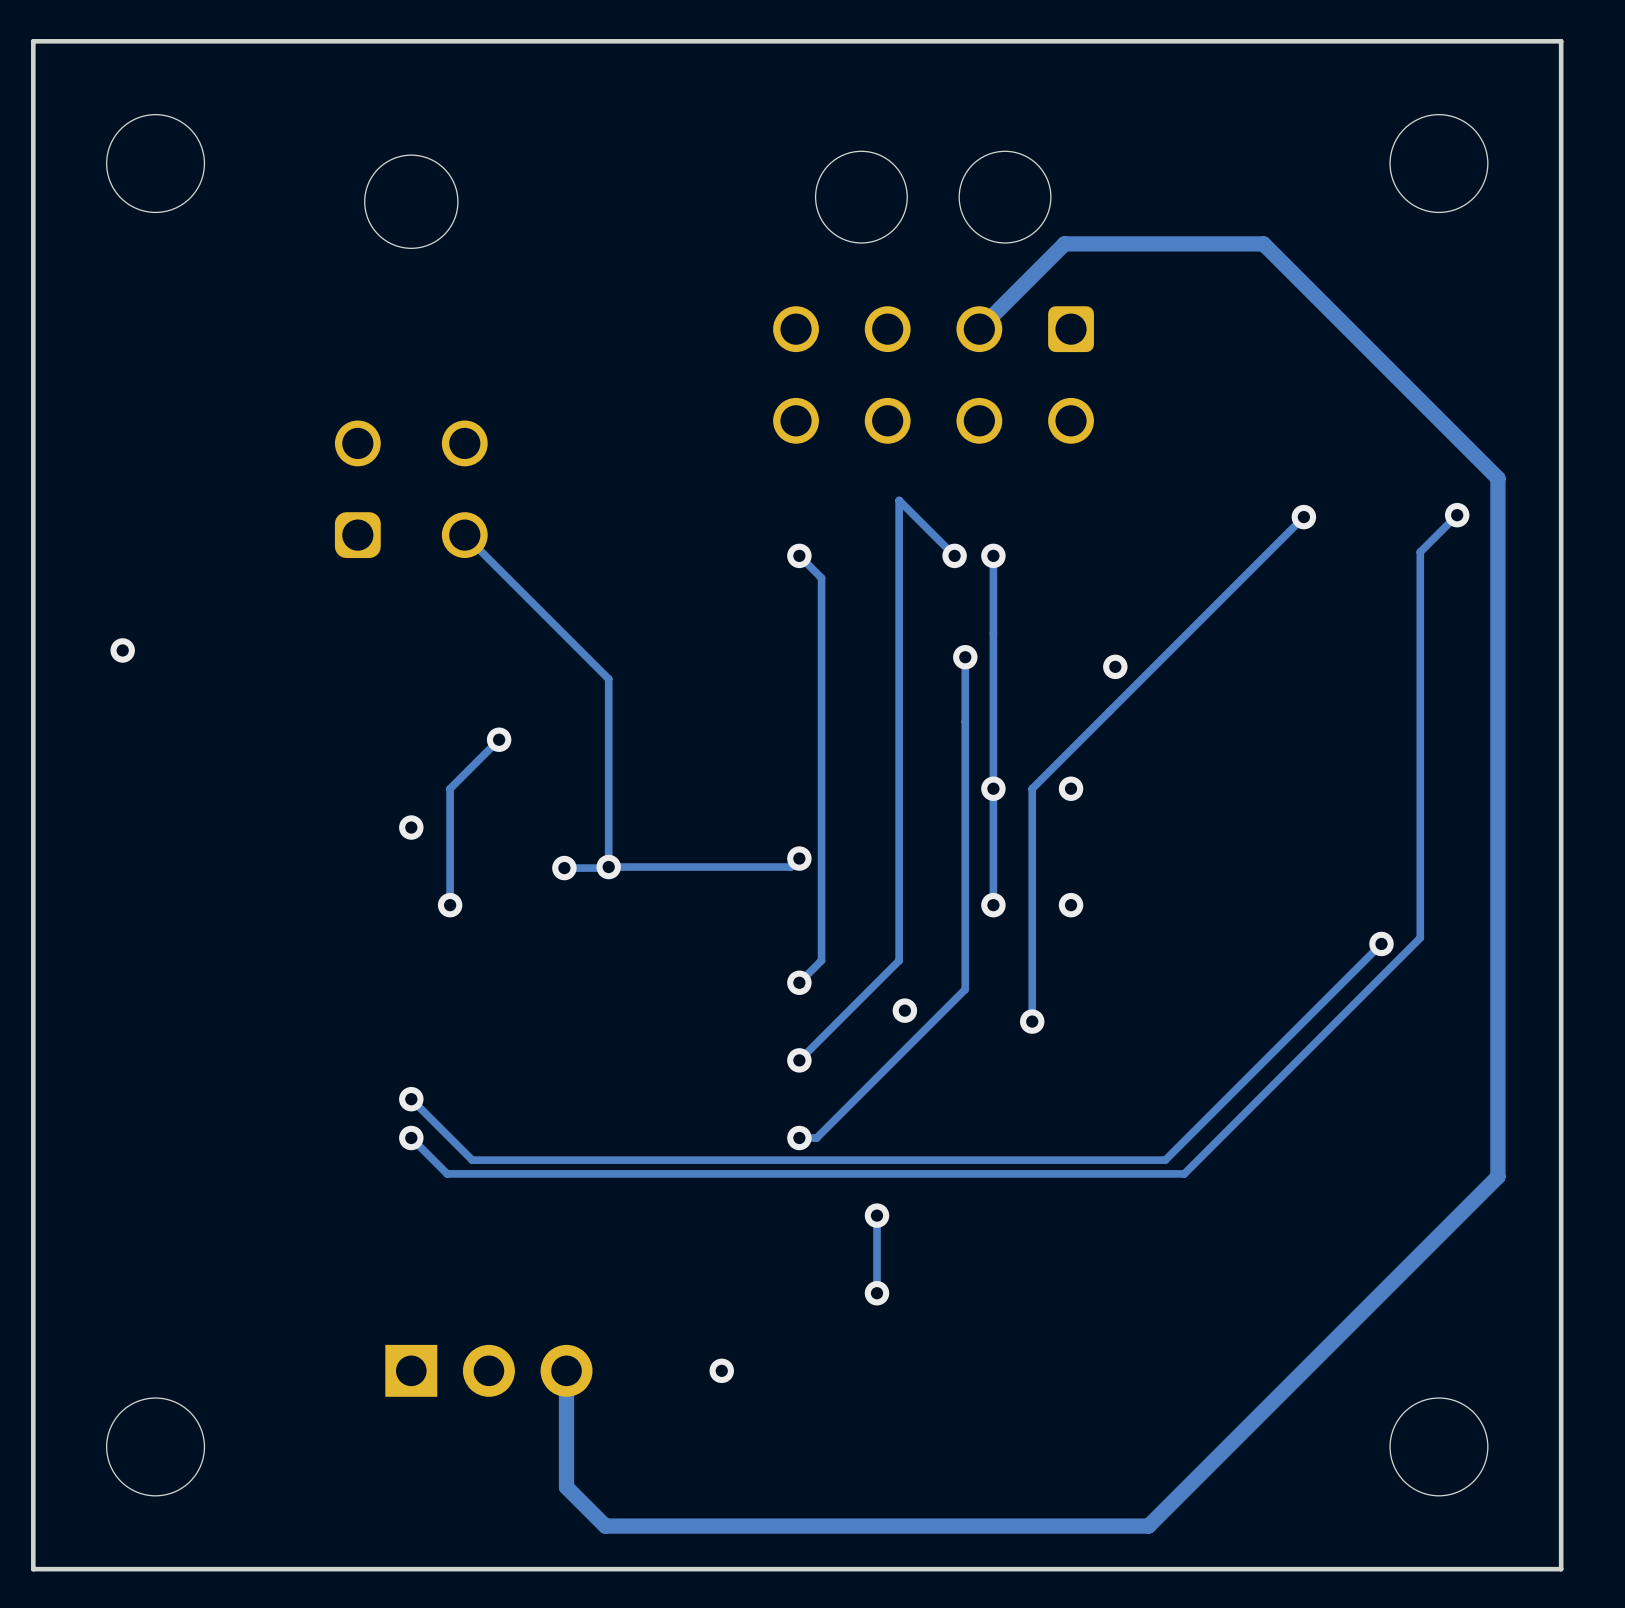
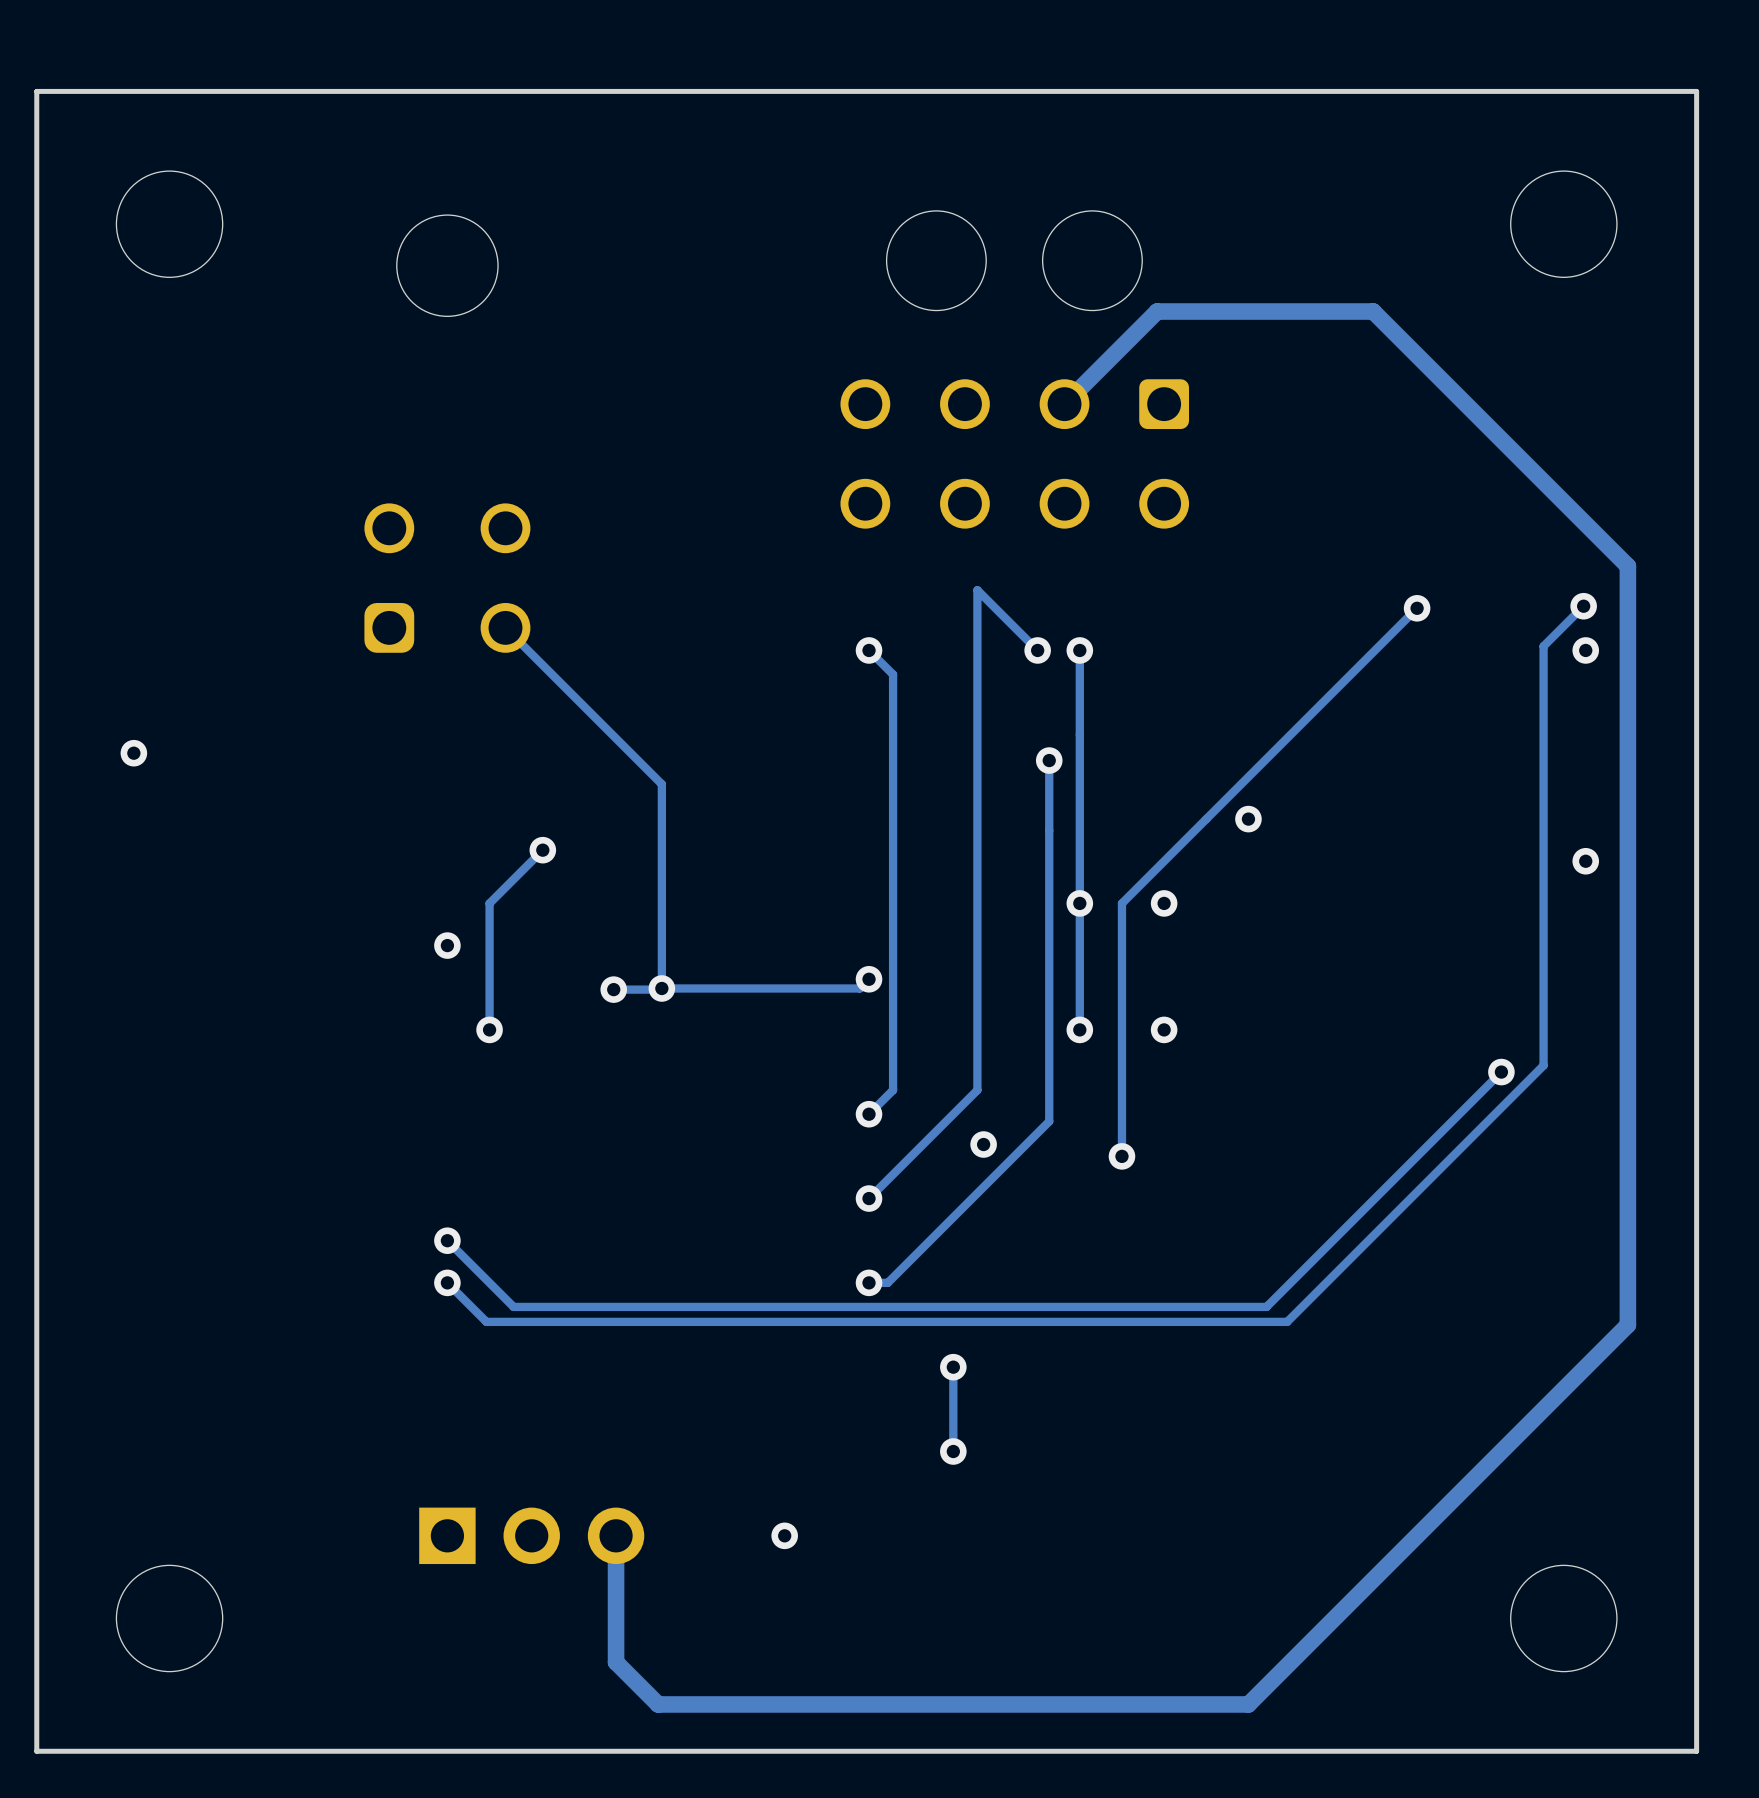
via: none -> (1585, 650)
via position: (1115, 666) -> (1248, 819)
via: none -> (1585, 861)

